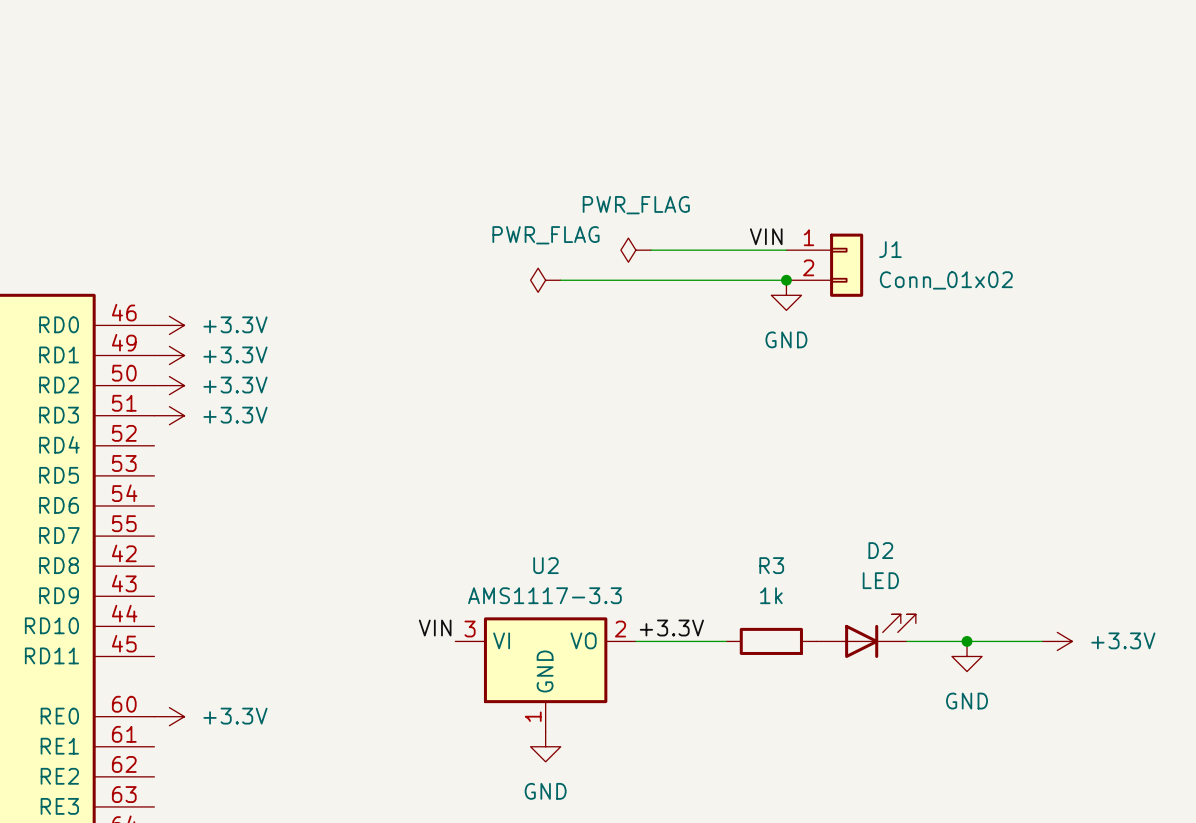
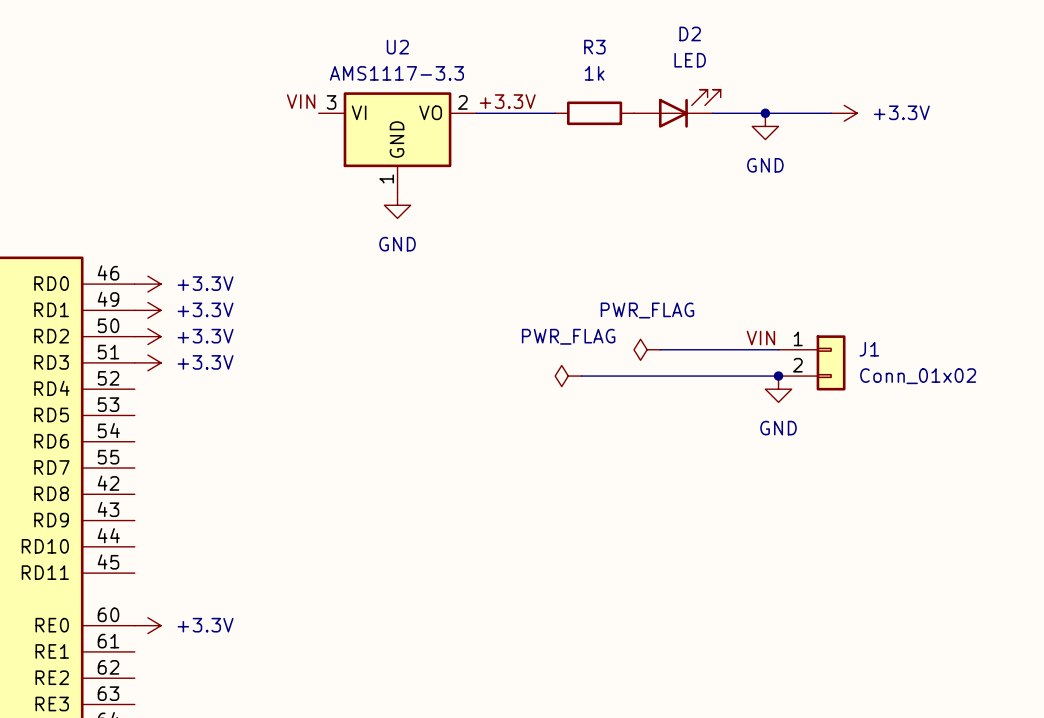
label: none -> VIN (301, 101)
label: none -> +3.3V (507, 101)
wire: none -> (476, 113) (555, 113)
wire: none -> (712, 113) (831, 113)
junction: none -> (765, 113)
power symbol: none -> +3.3V (844, 113)
power symbol: none -> GND (765, 126)
power symbol: none -> GND (397, 205)
label position: VIN (766, 236) -> VIN (760, 338)
power symbol: PWR_FLAG (635, 250) -> none
wire: (650, 250) (786, 250) -> (660, 349) (778, 349)
J1 position: (824, 265) -> (812, 362)
power symbol: PWR_FLAG (545, 280) -> none
wire: (560, 280) (786, 280) -> (581, 376) (778, 376)
junction: (786, 280) -> none
power symbol: GND (786, 295) -> none
power symbol: none -> PWR_FLAG (647, 349)
power symbol: none -> PWR_FLAG (568, 376)
junction: none -> (778, 376)
power symbol: none -> GND (778, 389)
label: VIN (435, 628) -> none
label: +3.3V (671, 628) -> none
D2 position: (866, 636) -> (677, 108)
wire: (635, 641) (726, 641) -> none
R3 position: (771, 641) -> (594, 113)
wire: (906, 641) (1042, 641) -> none
junction: (967, 641) -> none
power symbol: +3.3V (1057, 641) -> none
power symbol: GND (967, 656) -> none
U2 position: (545, 674) -> (397, 142)
power symbol: GND (545, 746) -> none

